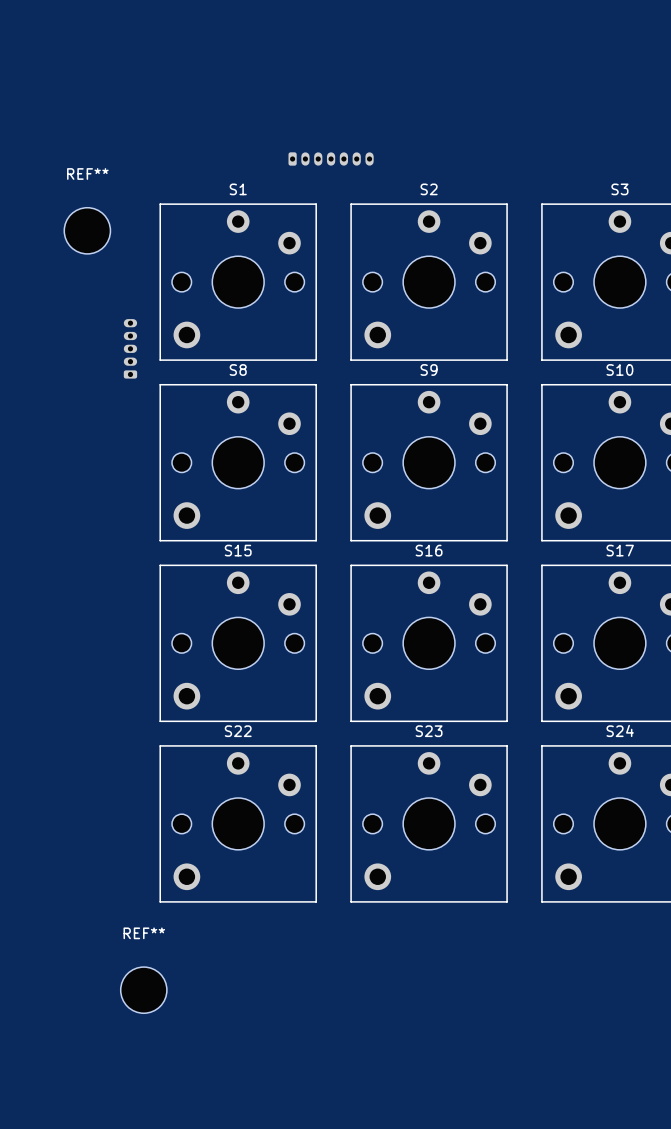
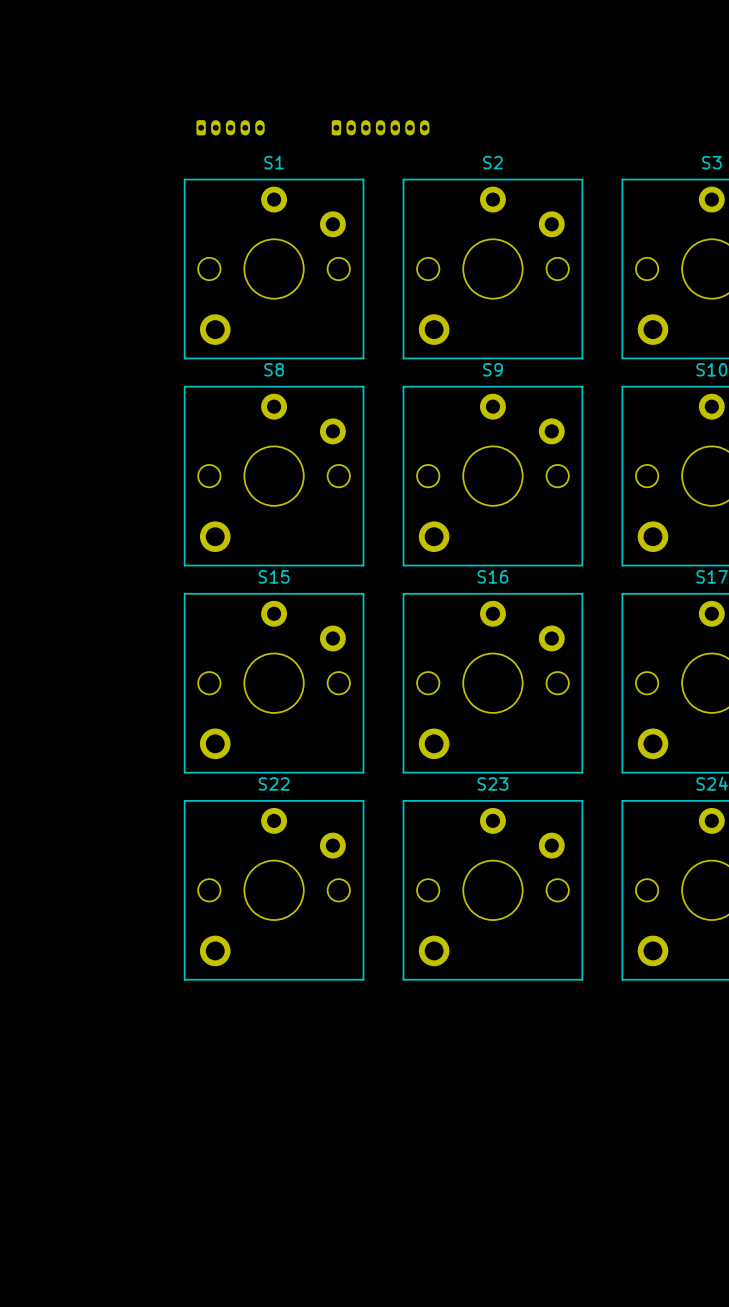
REF**: (87, 230) -> none
part rotation: 0° (130, 348) -> 90° clockwise (230, 127)
part position: (130, 348) -> (230, 127)
REF**: (143, 990) -> none

